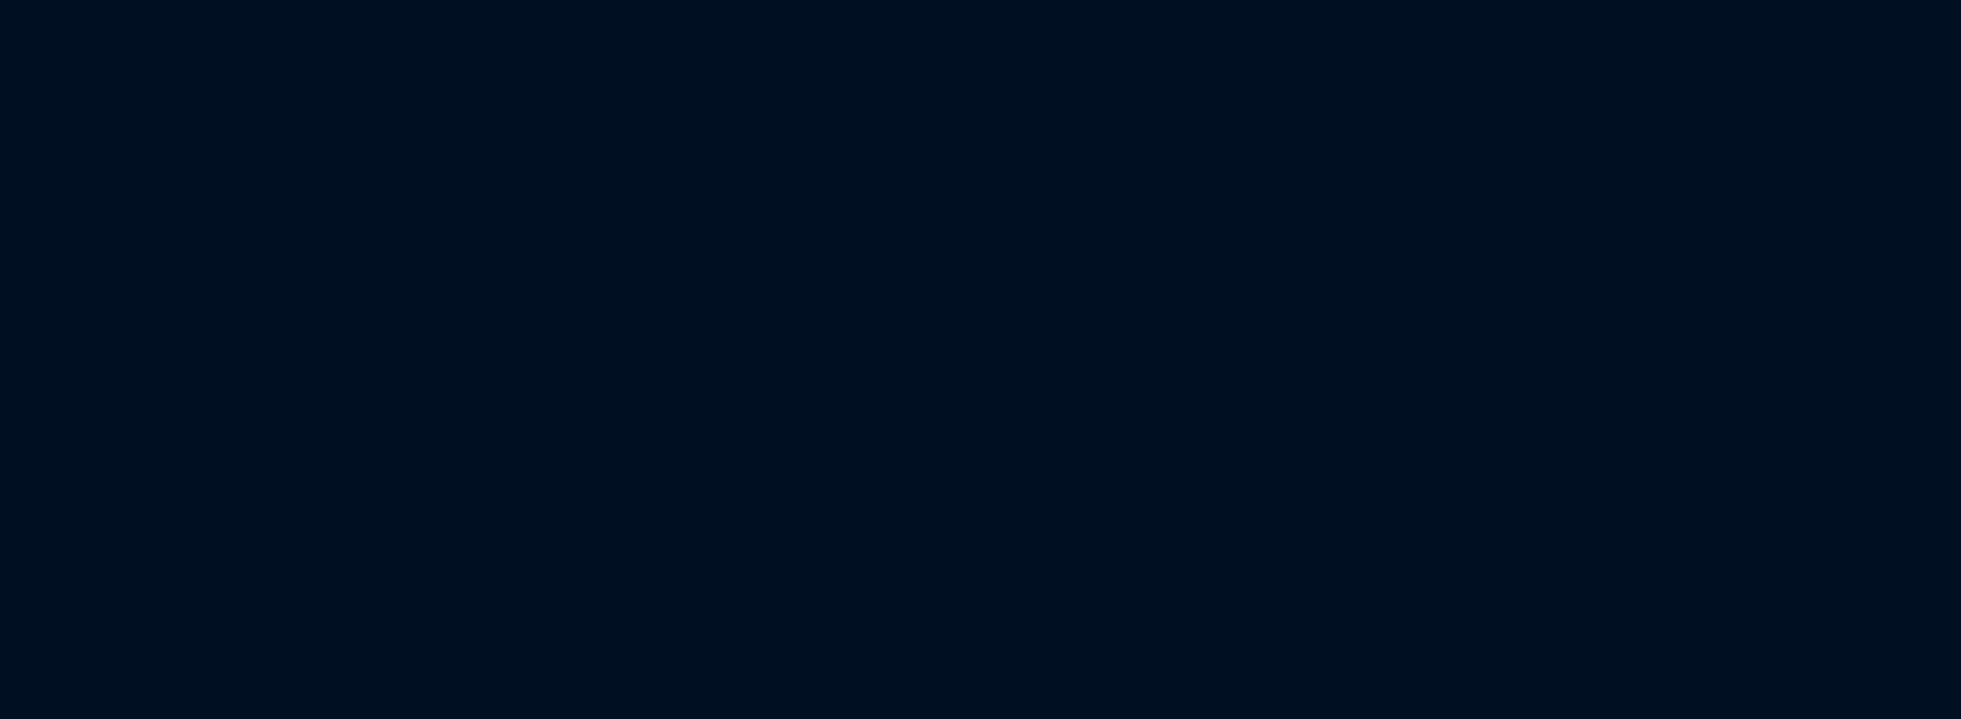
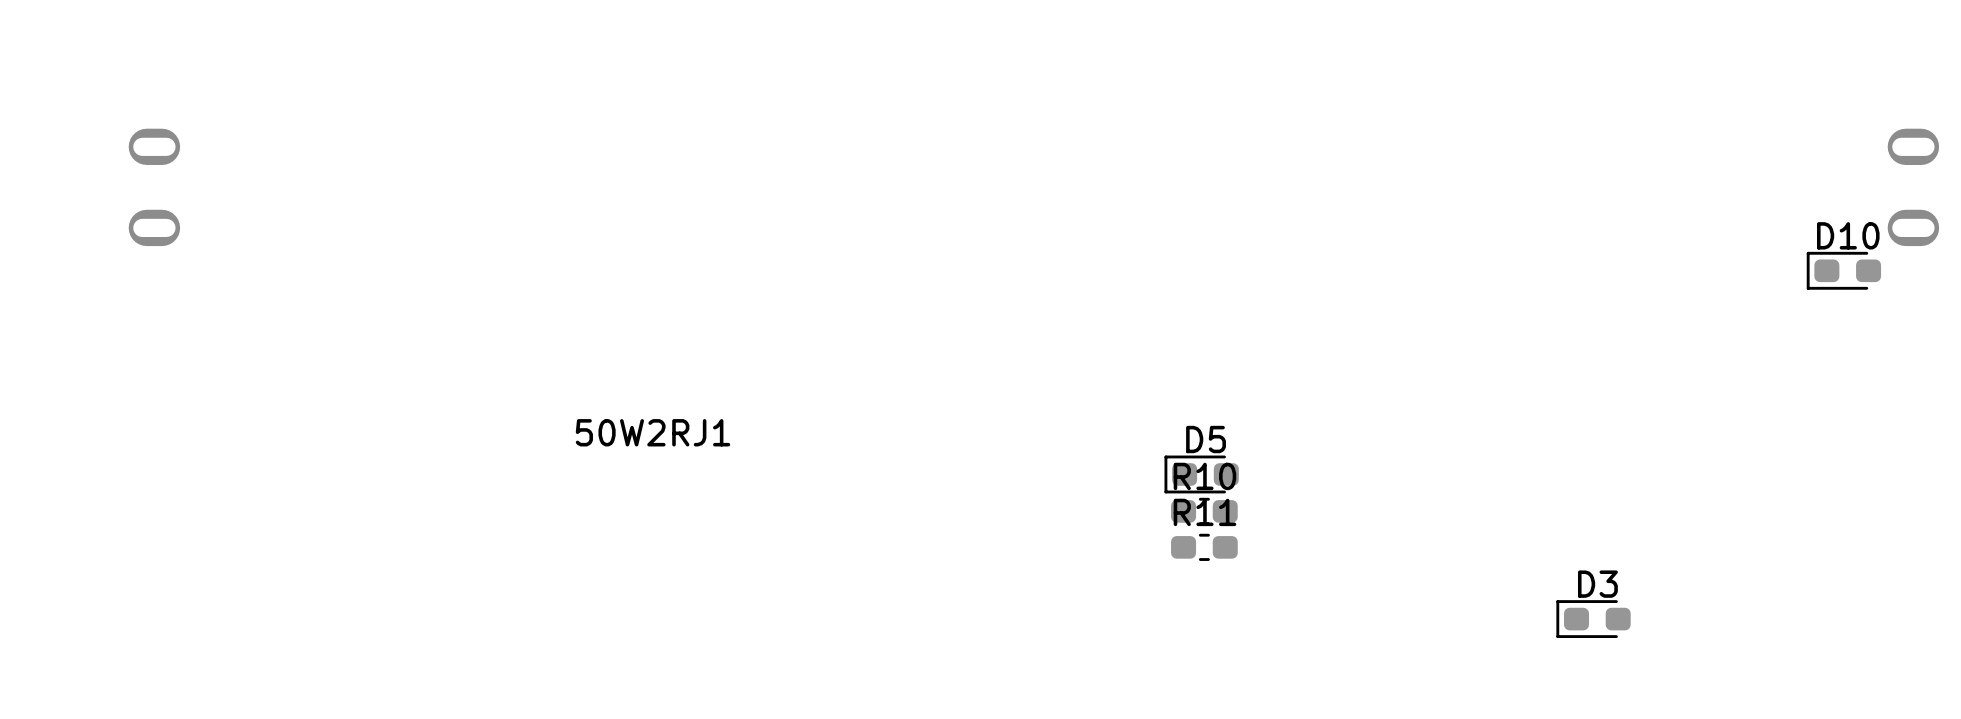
50W2RJ1: none -> (1033, 187)
D10: none -> (1843, 270)
D5: none -> (1201, 474)
R10: none -> (1204, 511)
R11: none -> (1204, 547)
D3: none -> (1593, 619)

